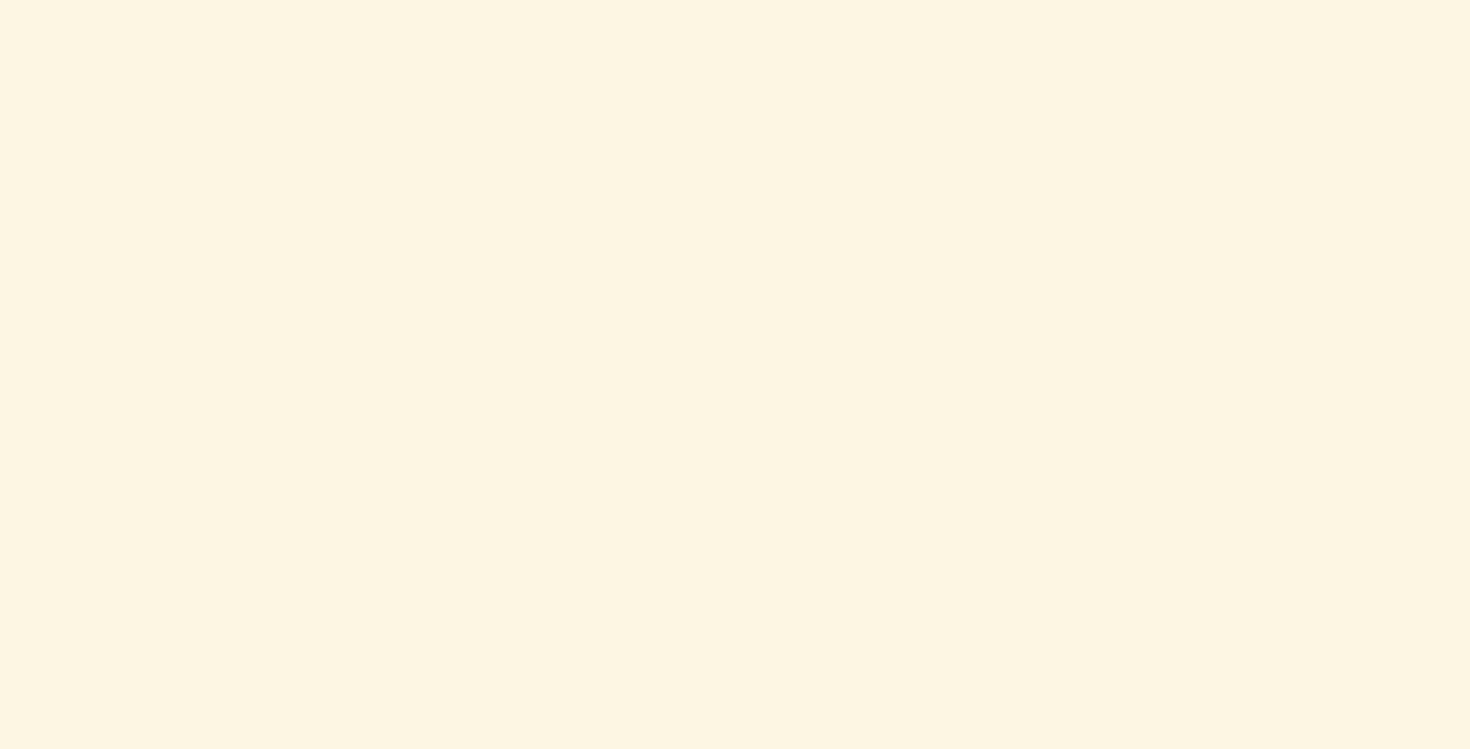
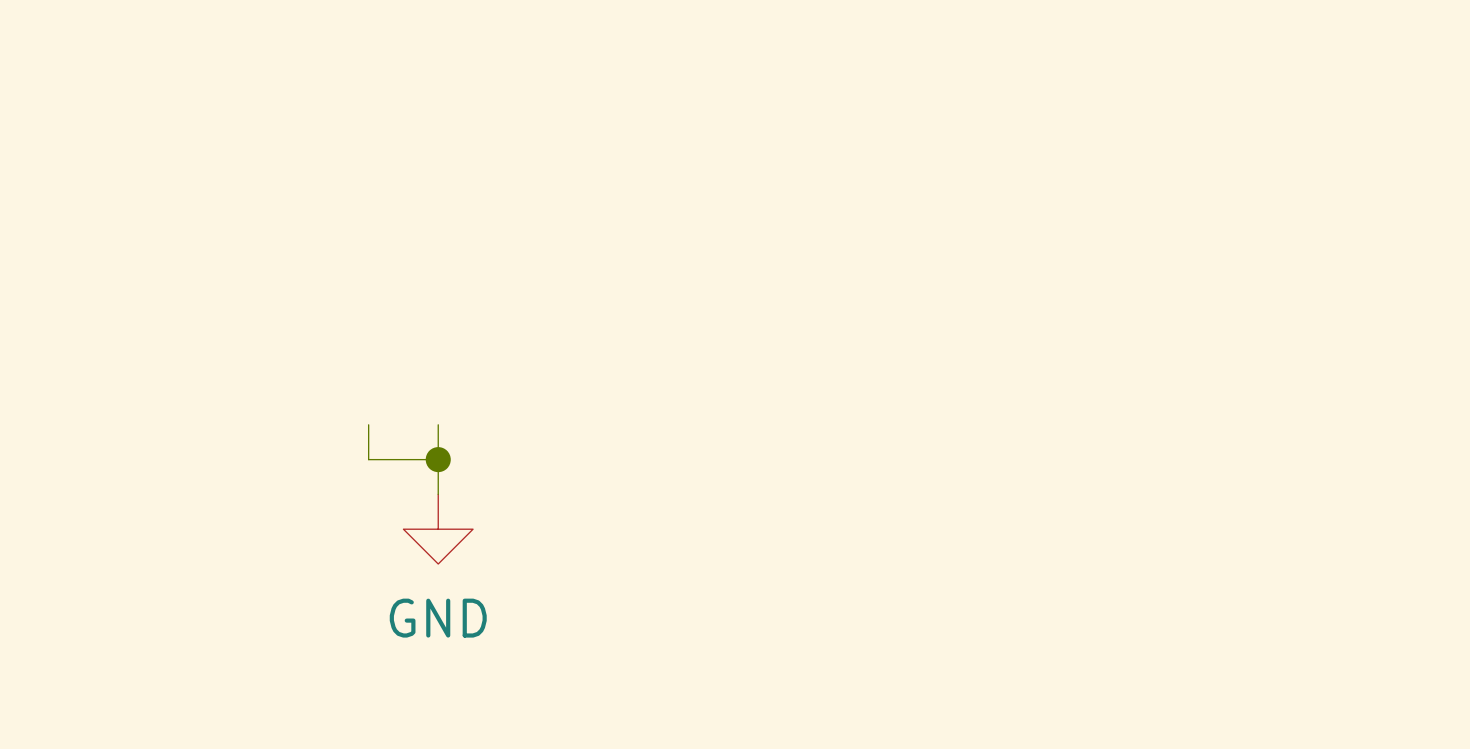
wire: none -> (368, 424) (368, 459) (438, 459)
wire: none -> (438, 424) (438, 494)
junction: none -> (438, 459)
power symbol: none -> GND (438, 529)

